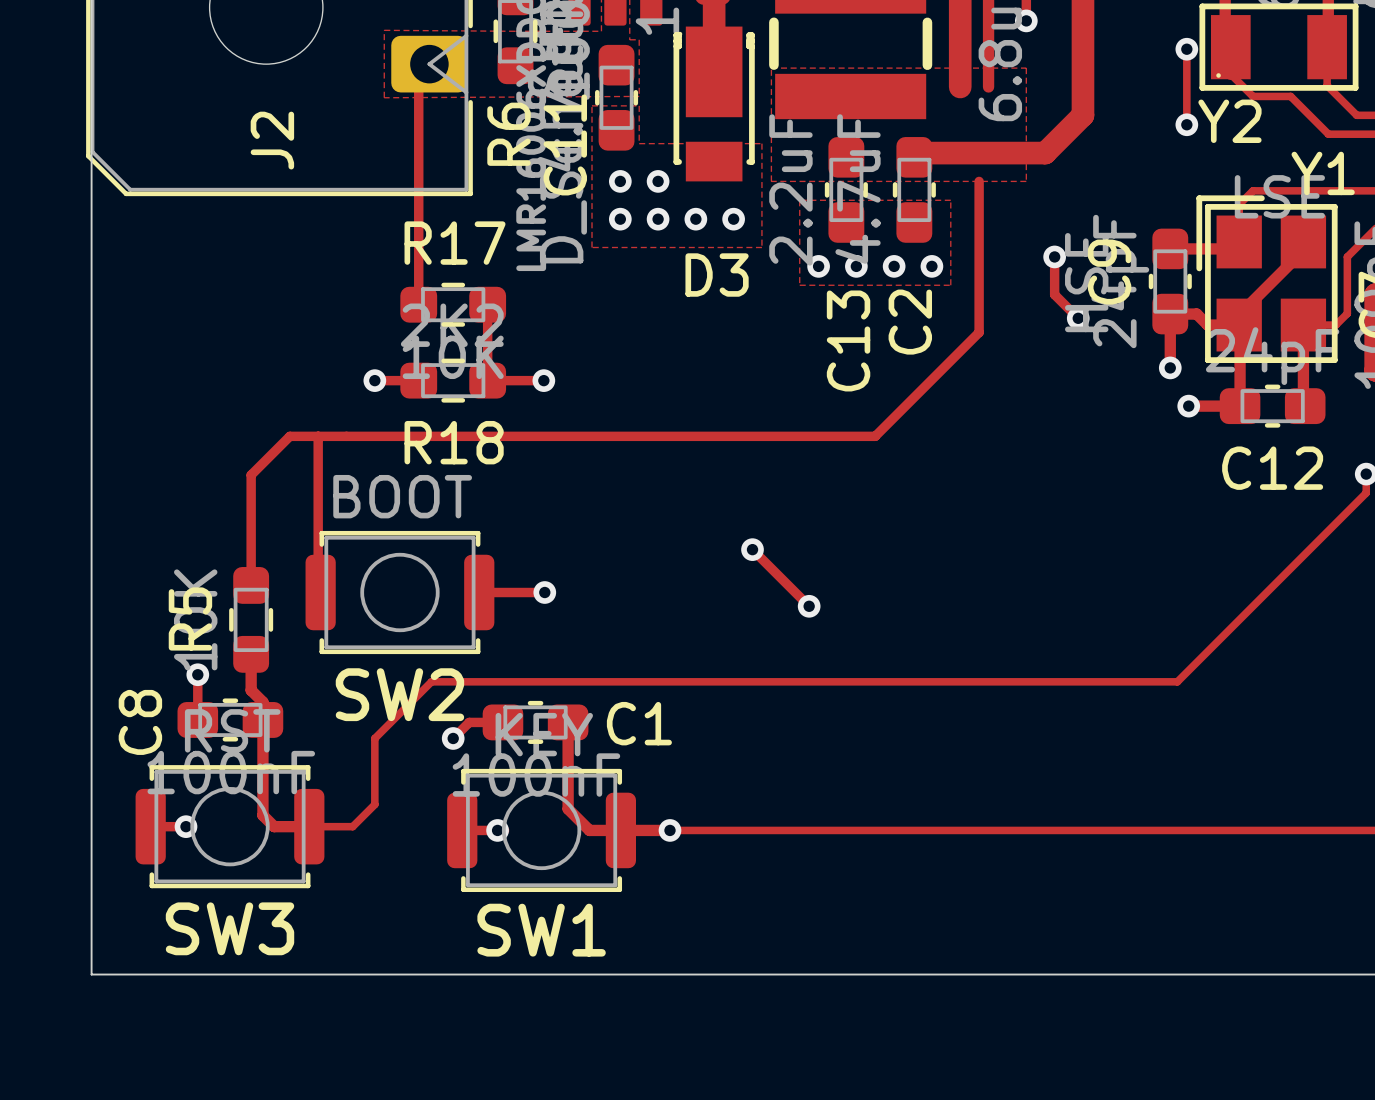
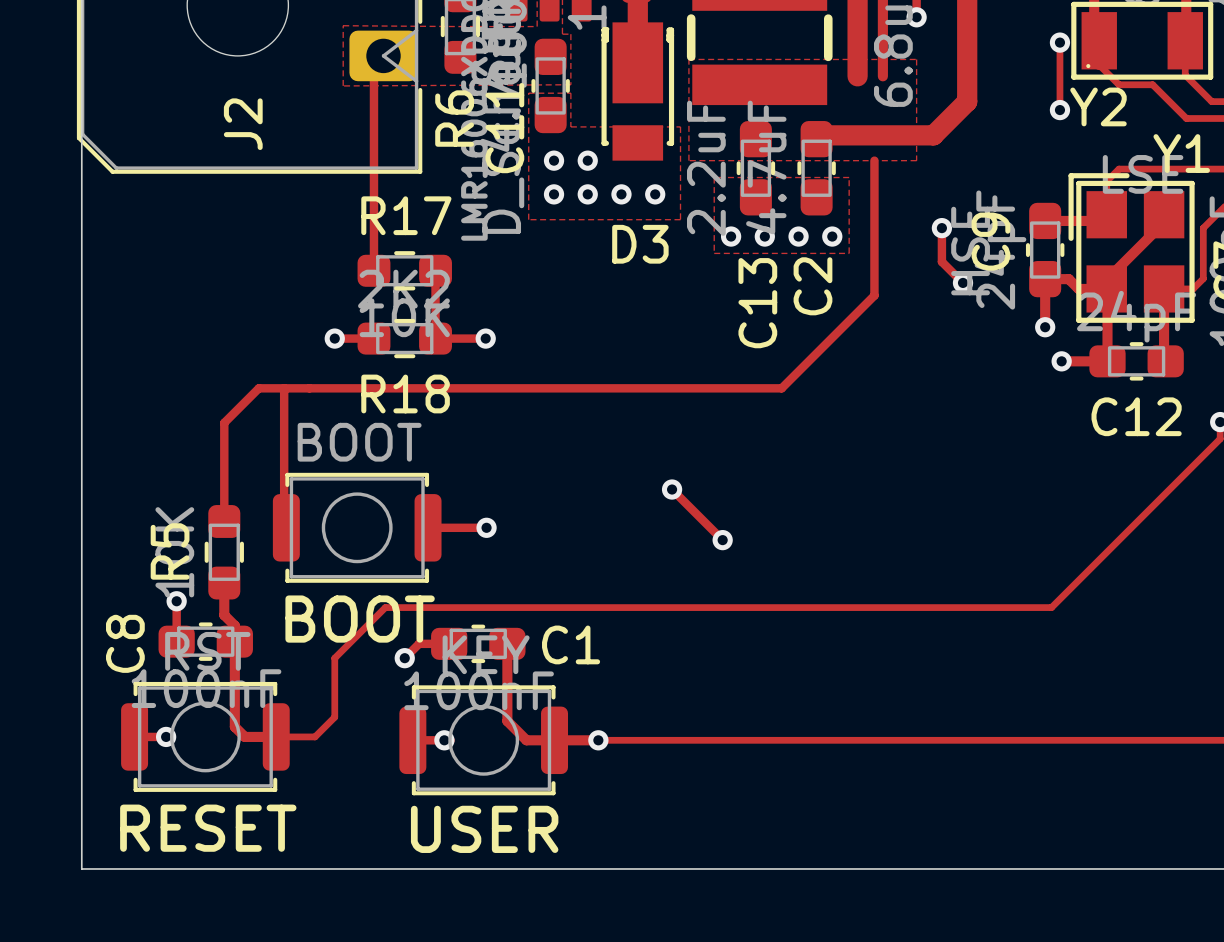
SW2 name: SW2 (399, 694) -> BOOT (360, 619)
SW3 name: SW3 (230, 928) -> RESET (208, 828)
SW1 name: SW1 (541, 930) -> USER (484, 829)

